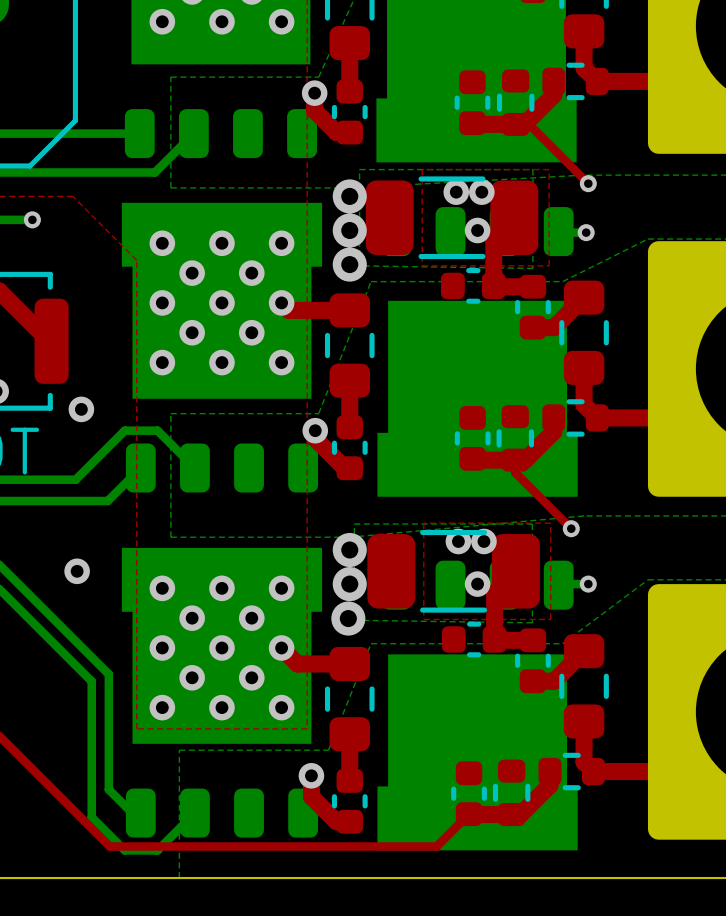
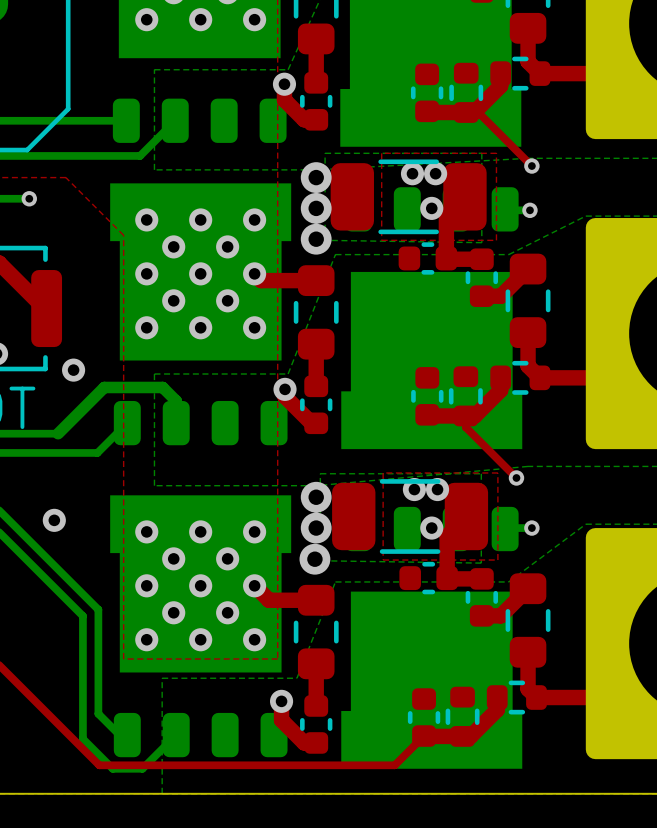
bottom track: (194, 468) (157, 430) (124, 430) (75, 479) (64, 479) -> (176, 423) (176, 400) (162, 387) (104, 387) (58, 433)
via position: (77, 571) -> (54, 520)

